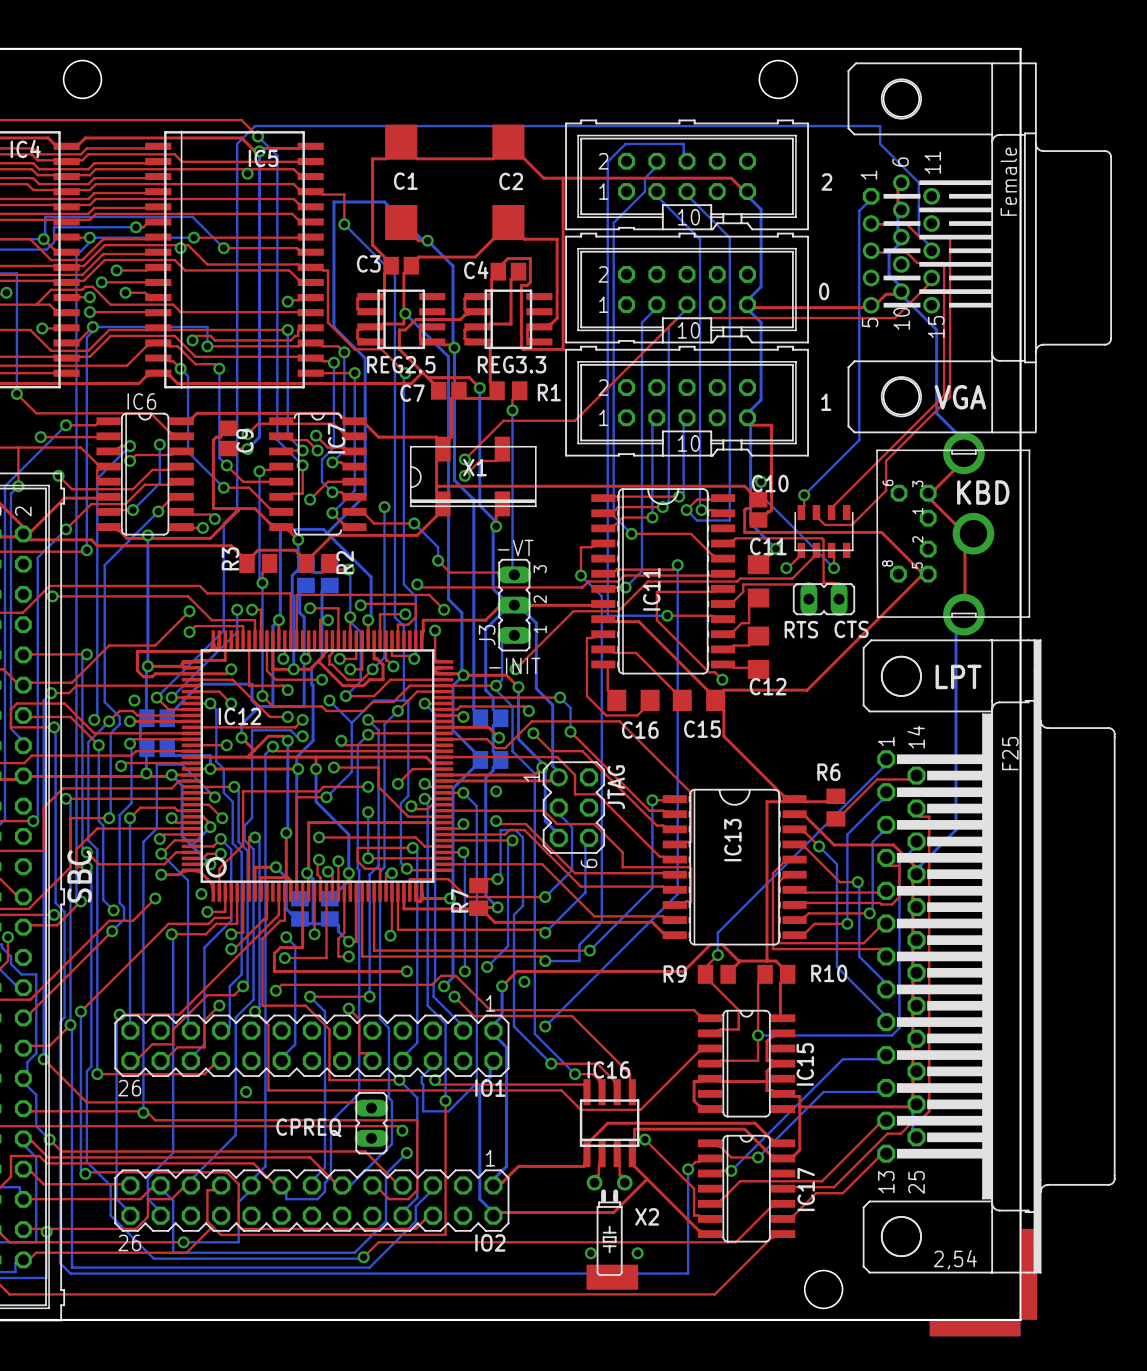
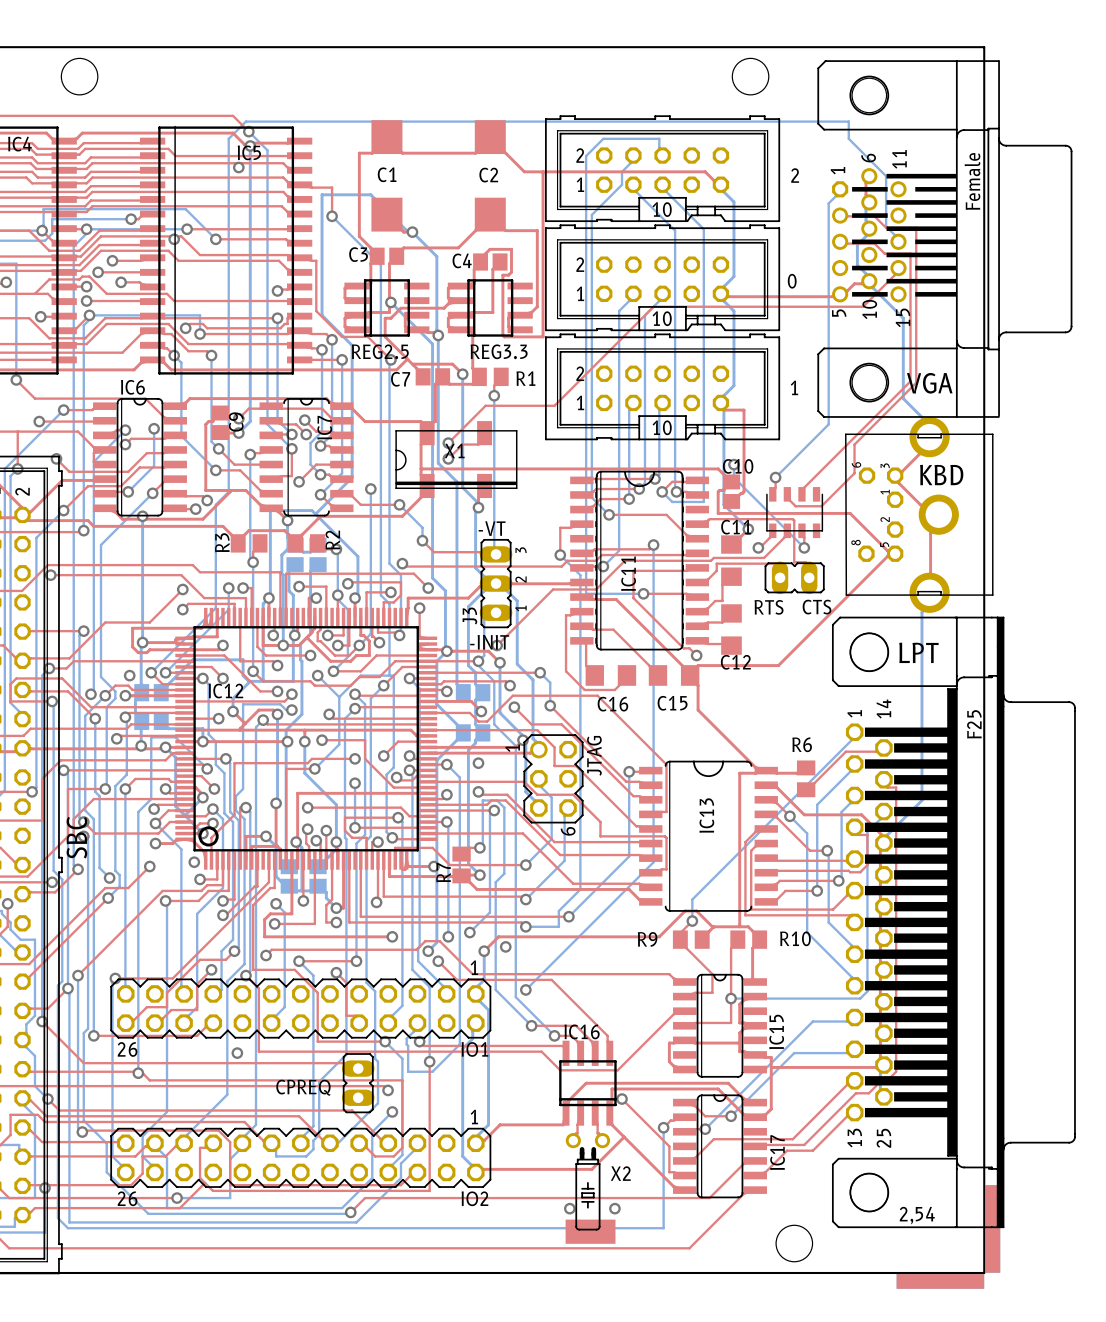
IC13 footprint: [662, 788, 807, 946] -> [639, 760, 778, 912]

